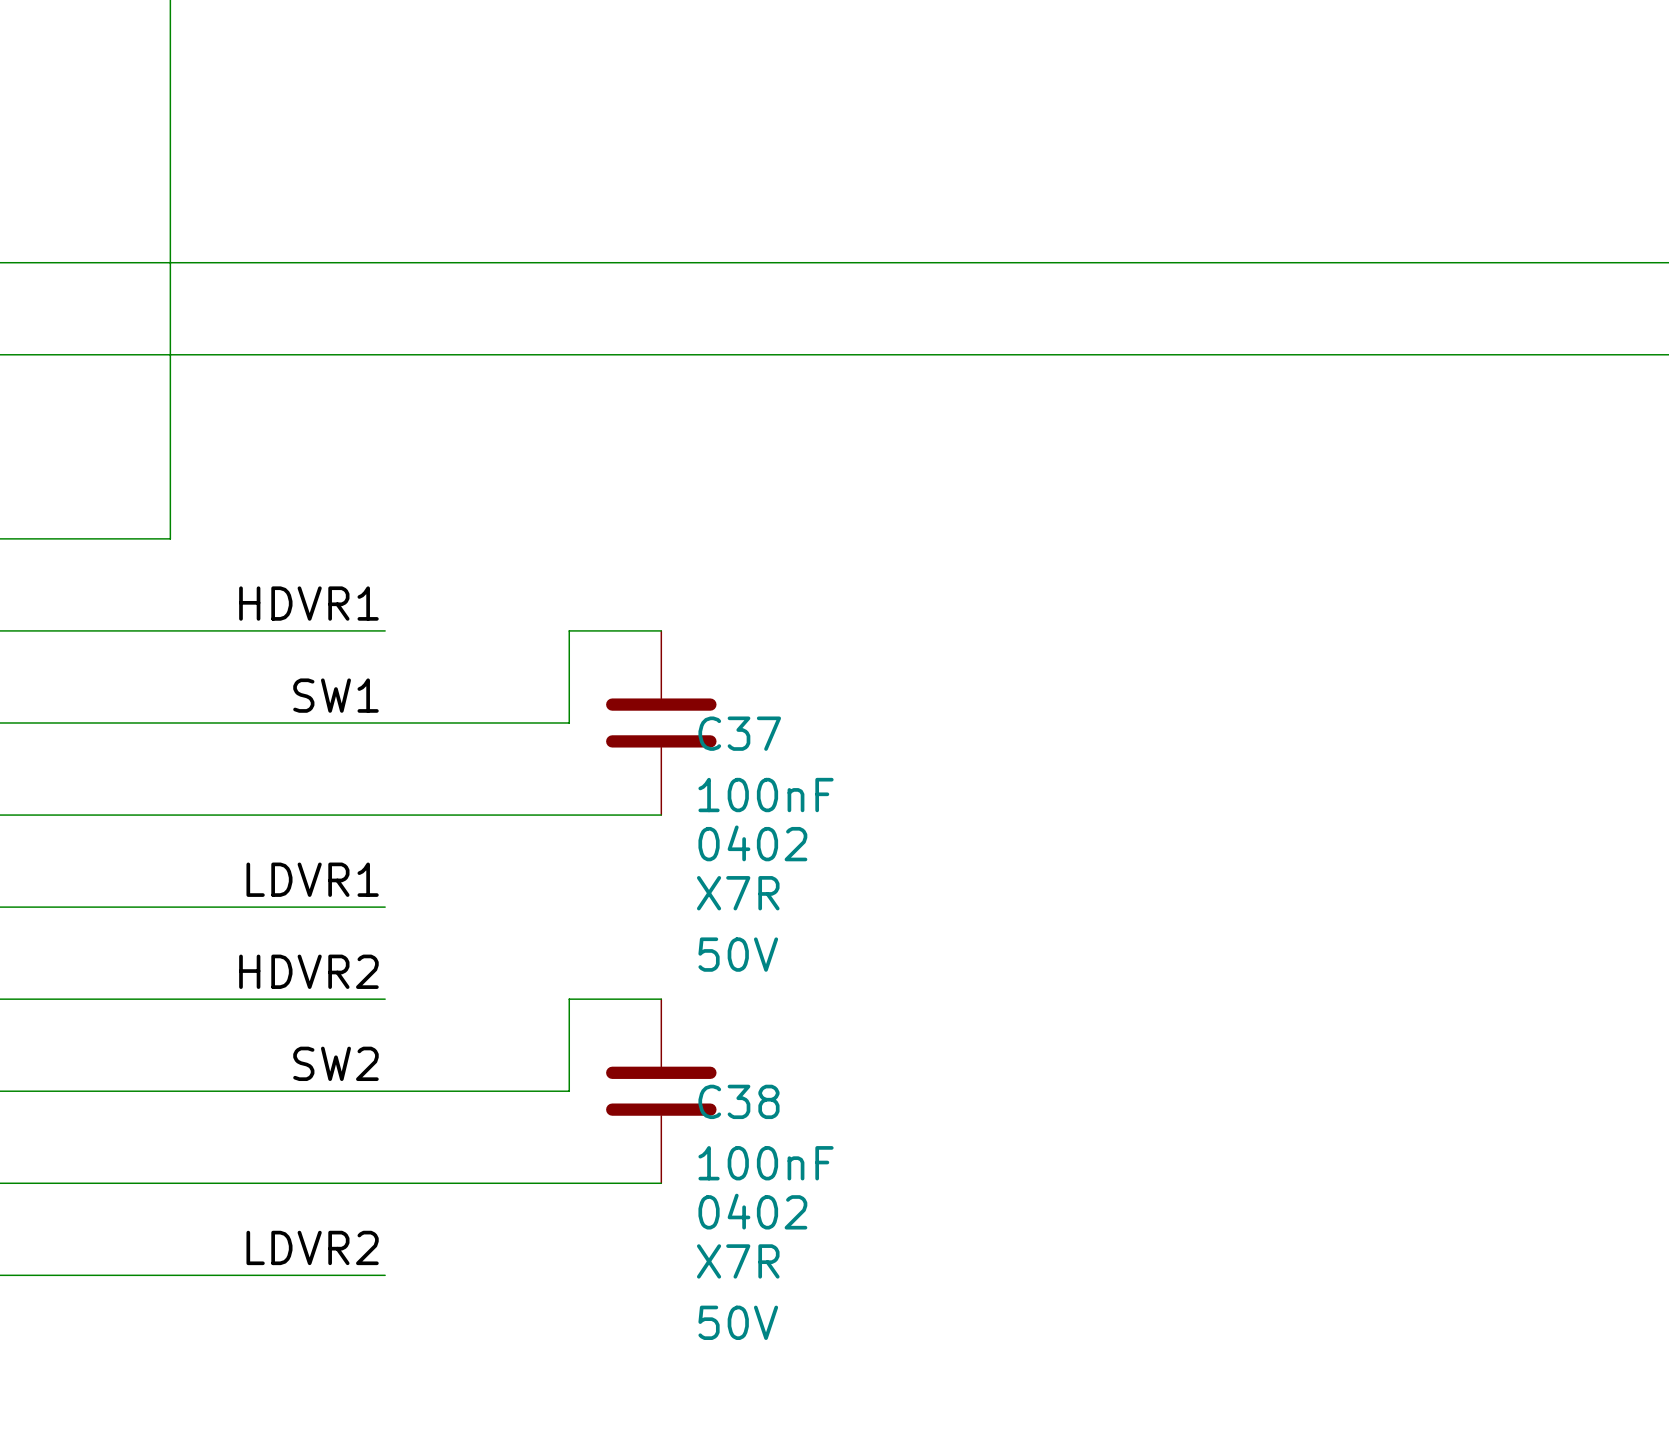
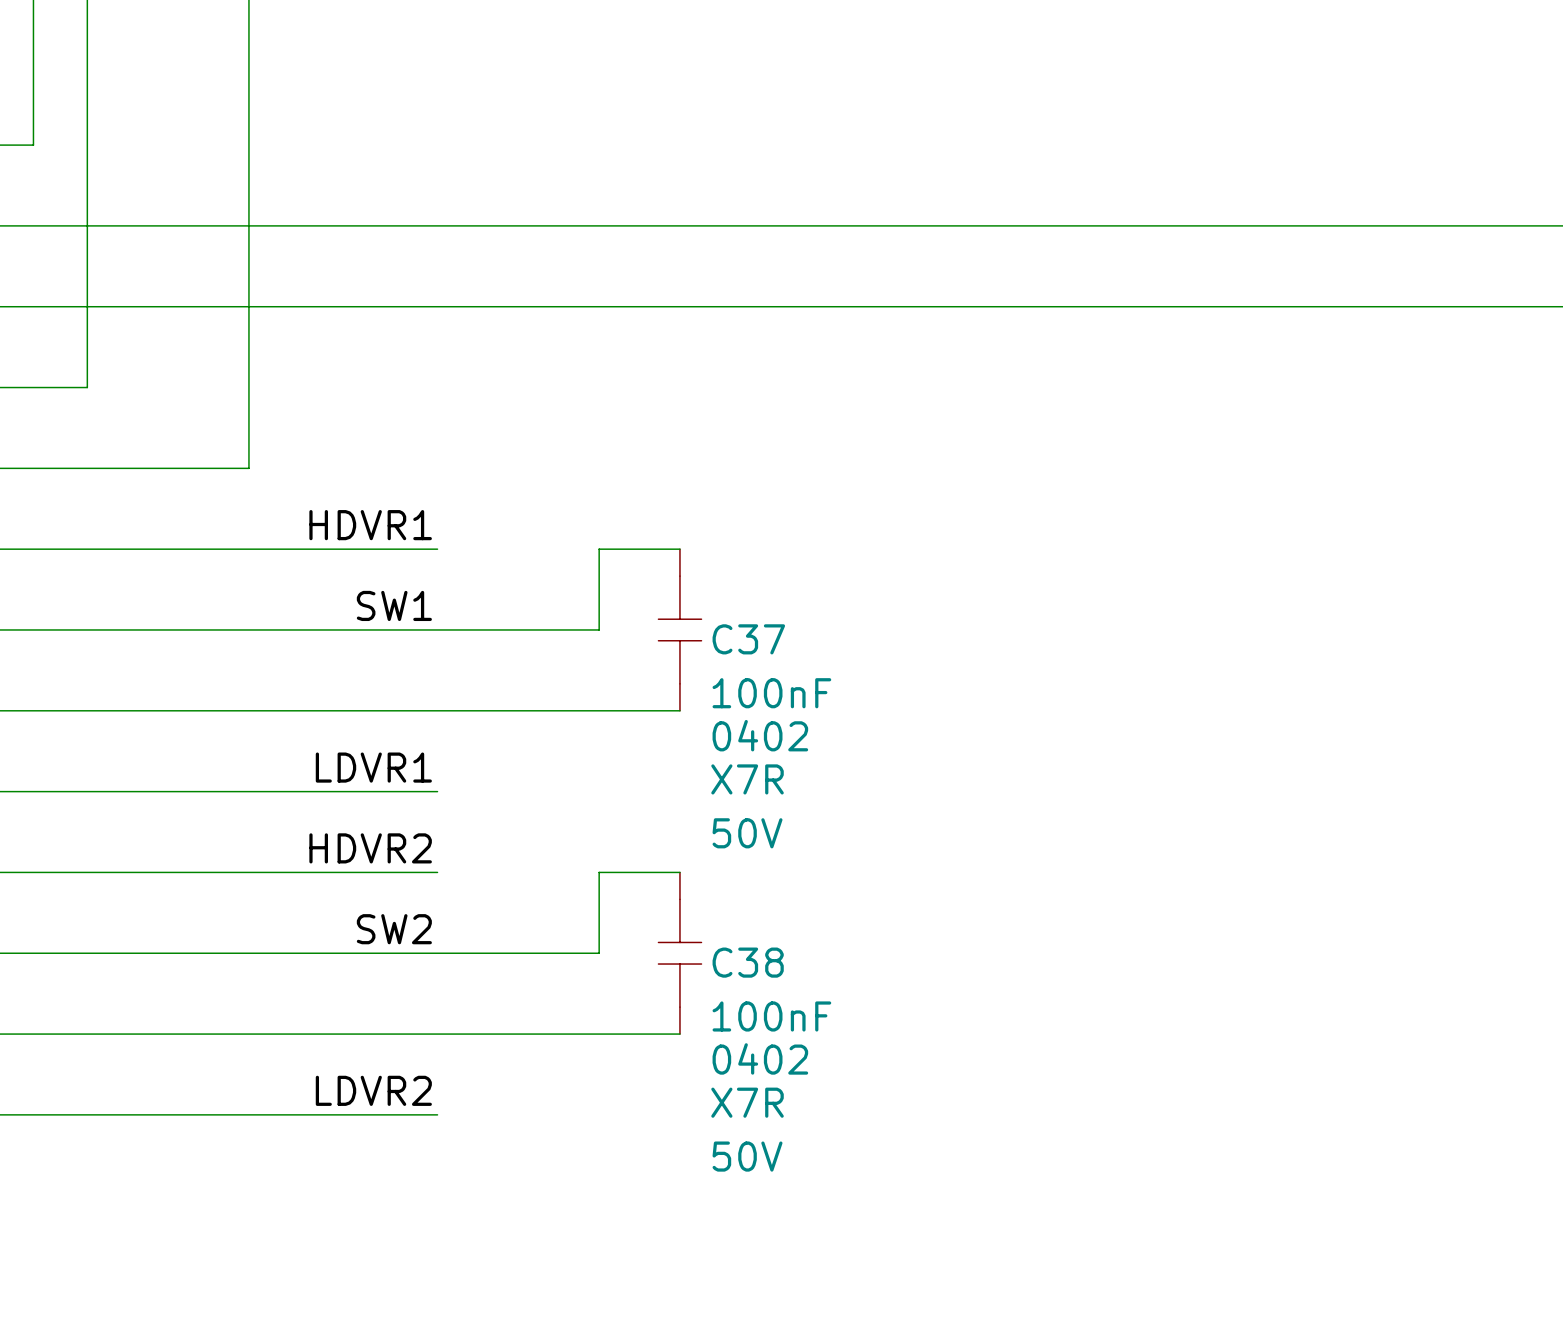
C37 symbol: [606, 630, 717, 816] -> [658, 549, 702, 711]
C38 symbol: [606, 999, 717, 1184] -> [658, 872, 702, 1035]

